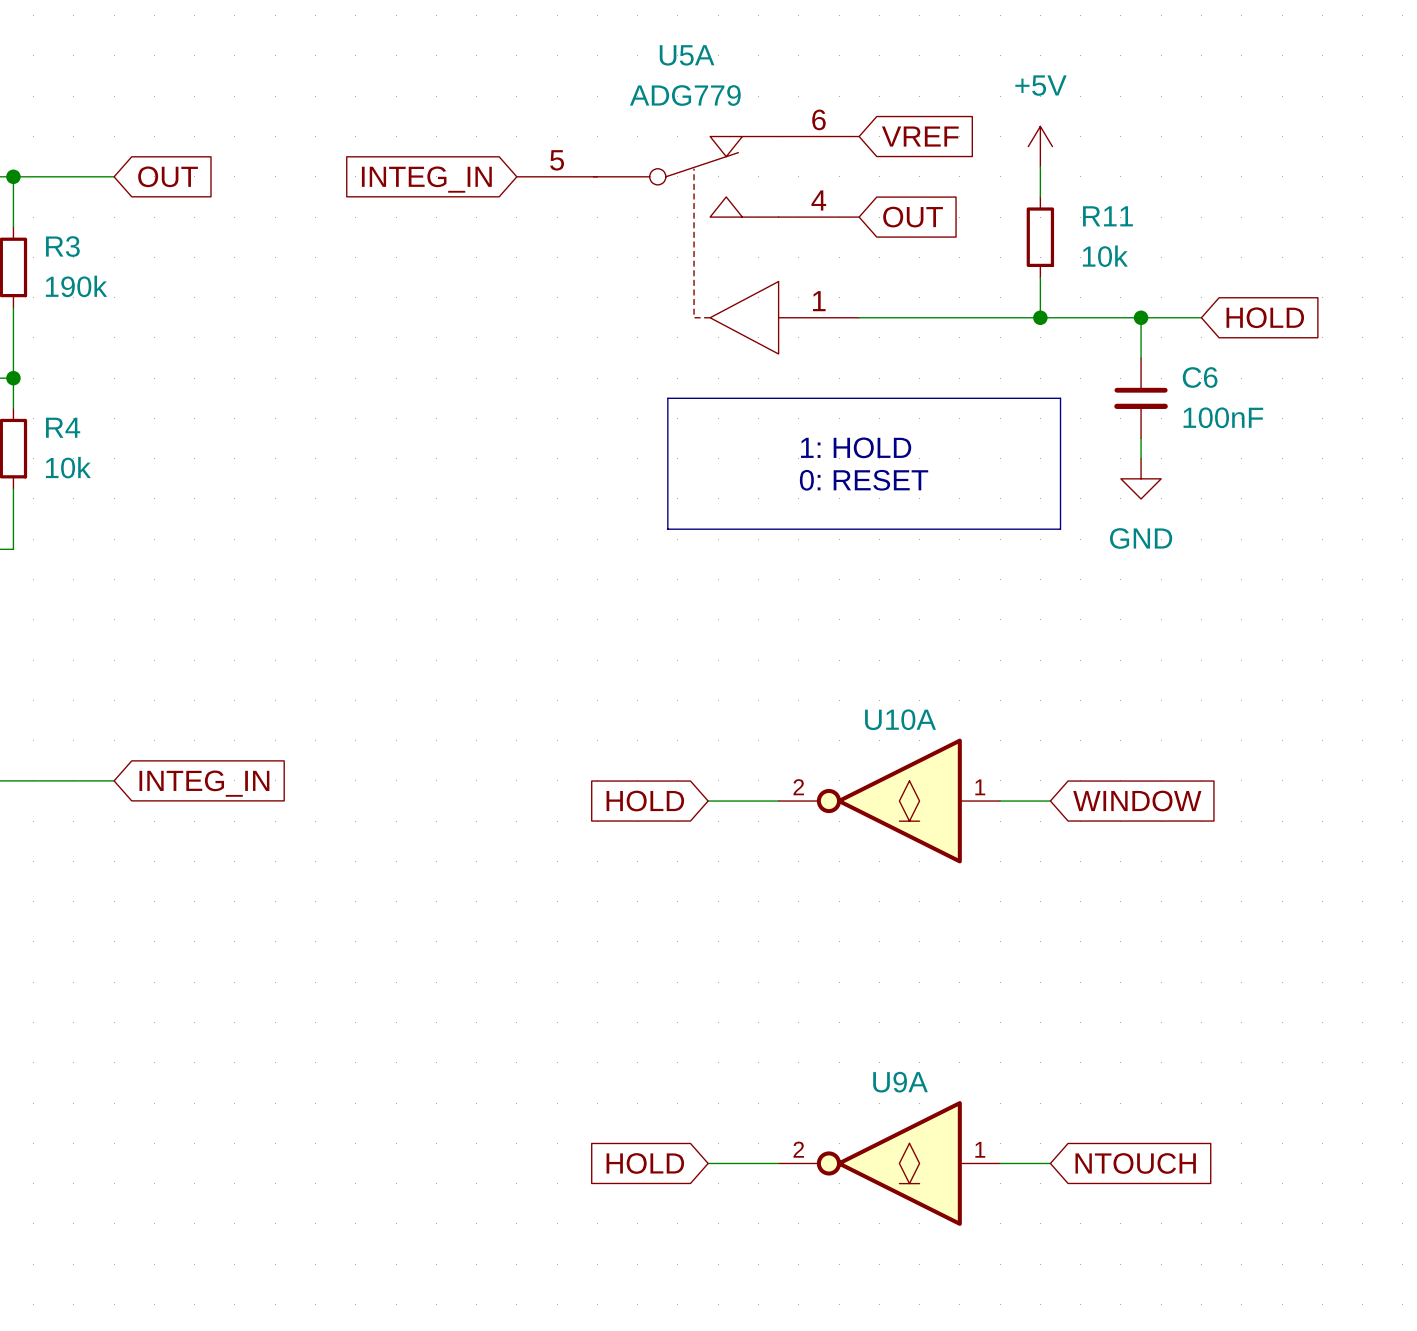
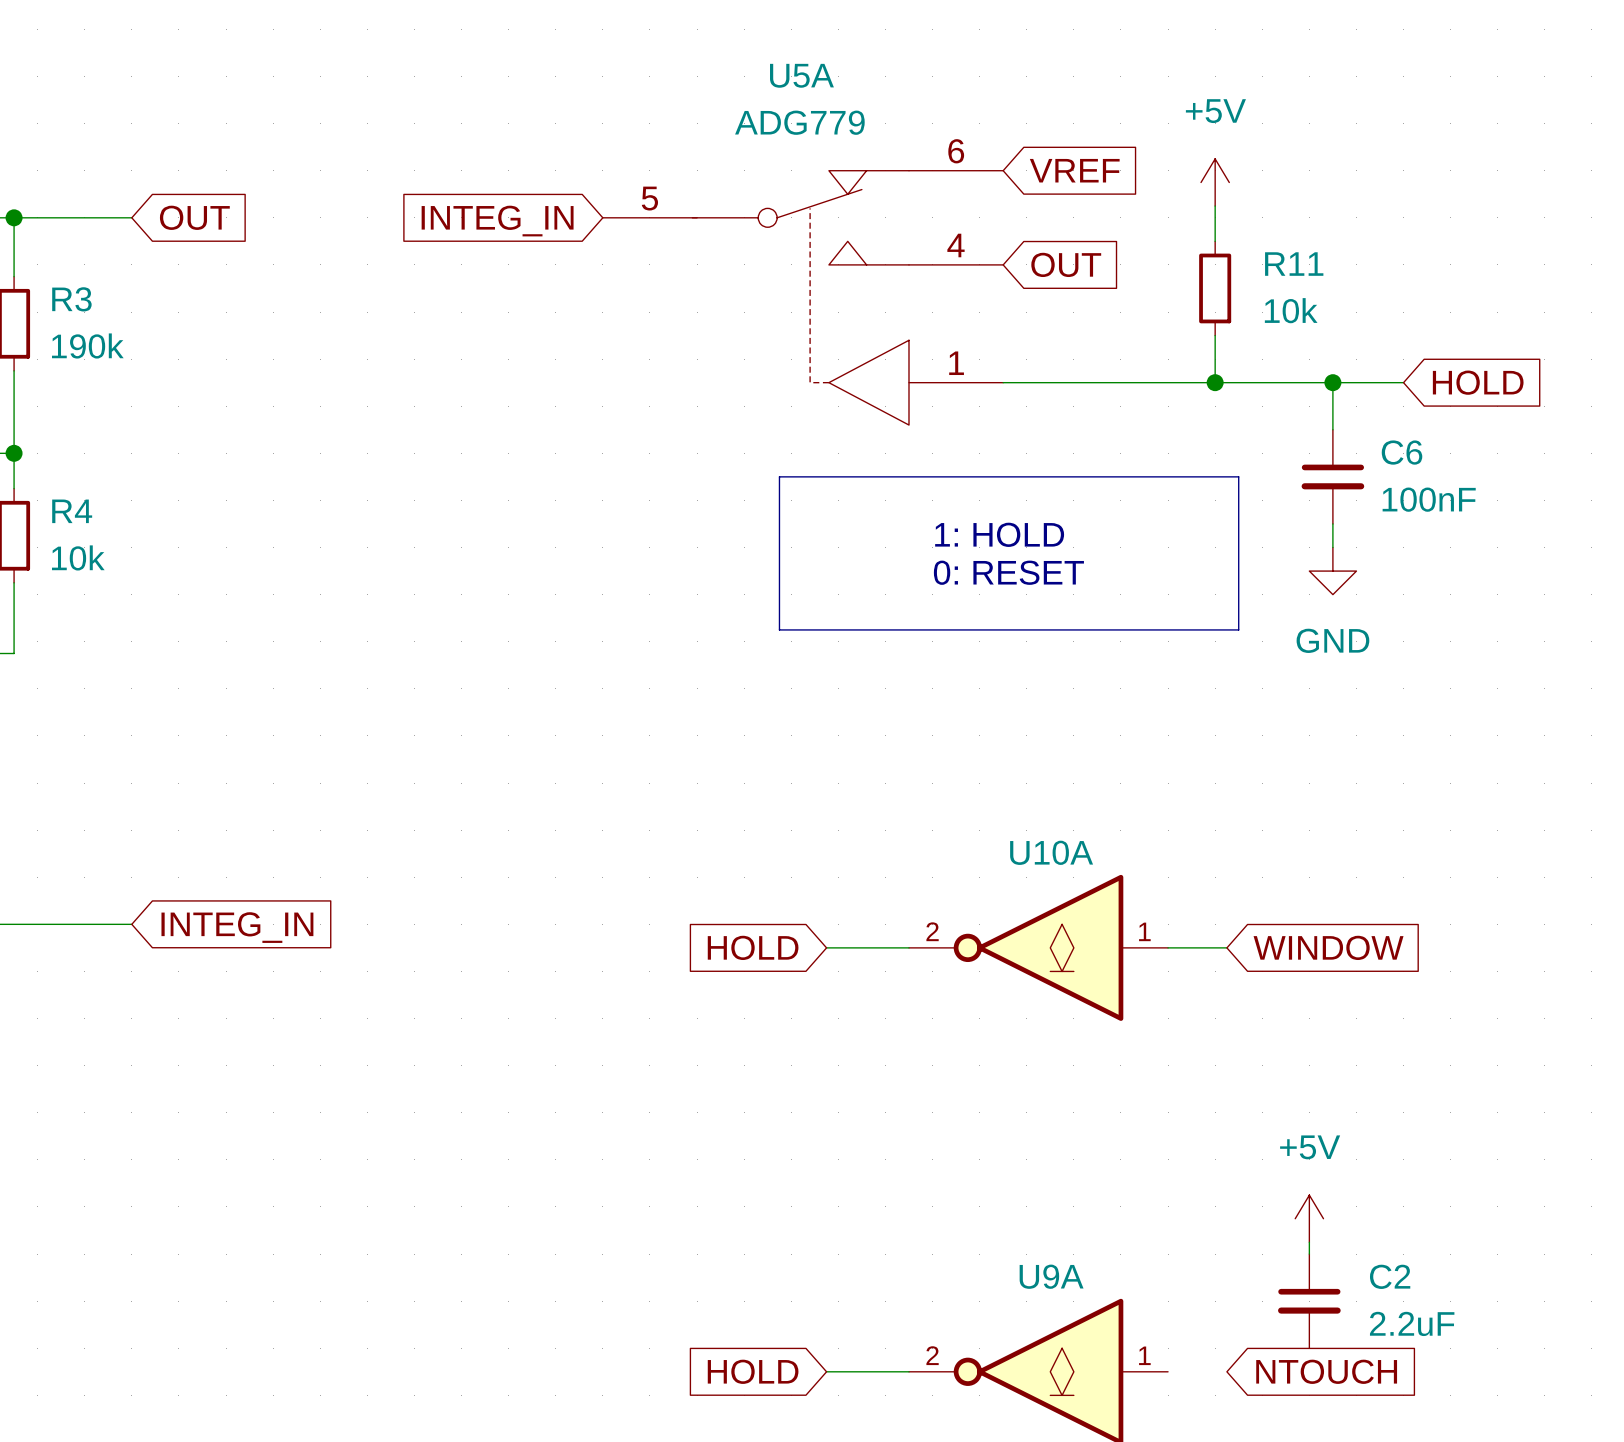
power symbol: none -> +5V (1309, 1218)
wire: none -> (1309, 1242) (1309, 1254)
C2: none -> 2.2uF (1309, 1301)
wire: (1000, 1163) (1050, 1163) -> none

